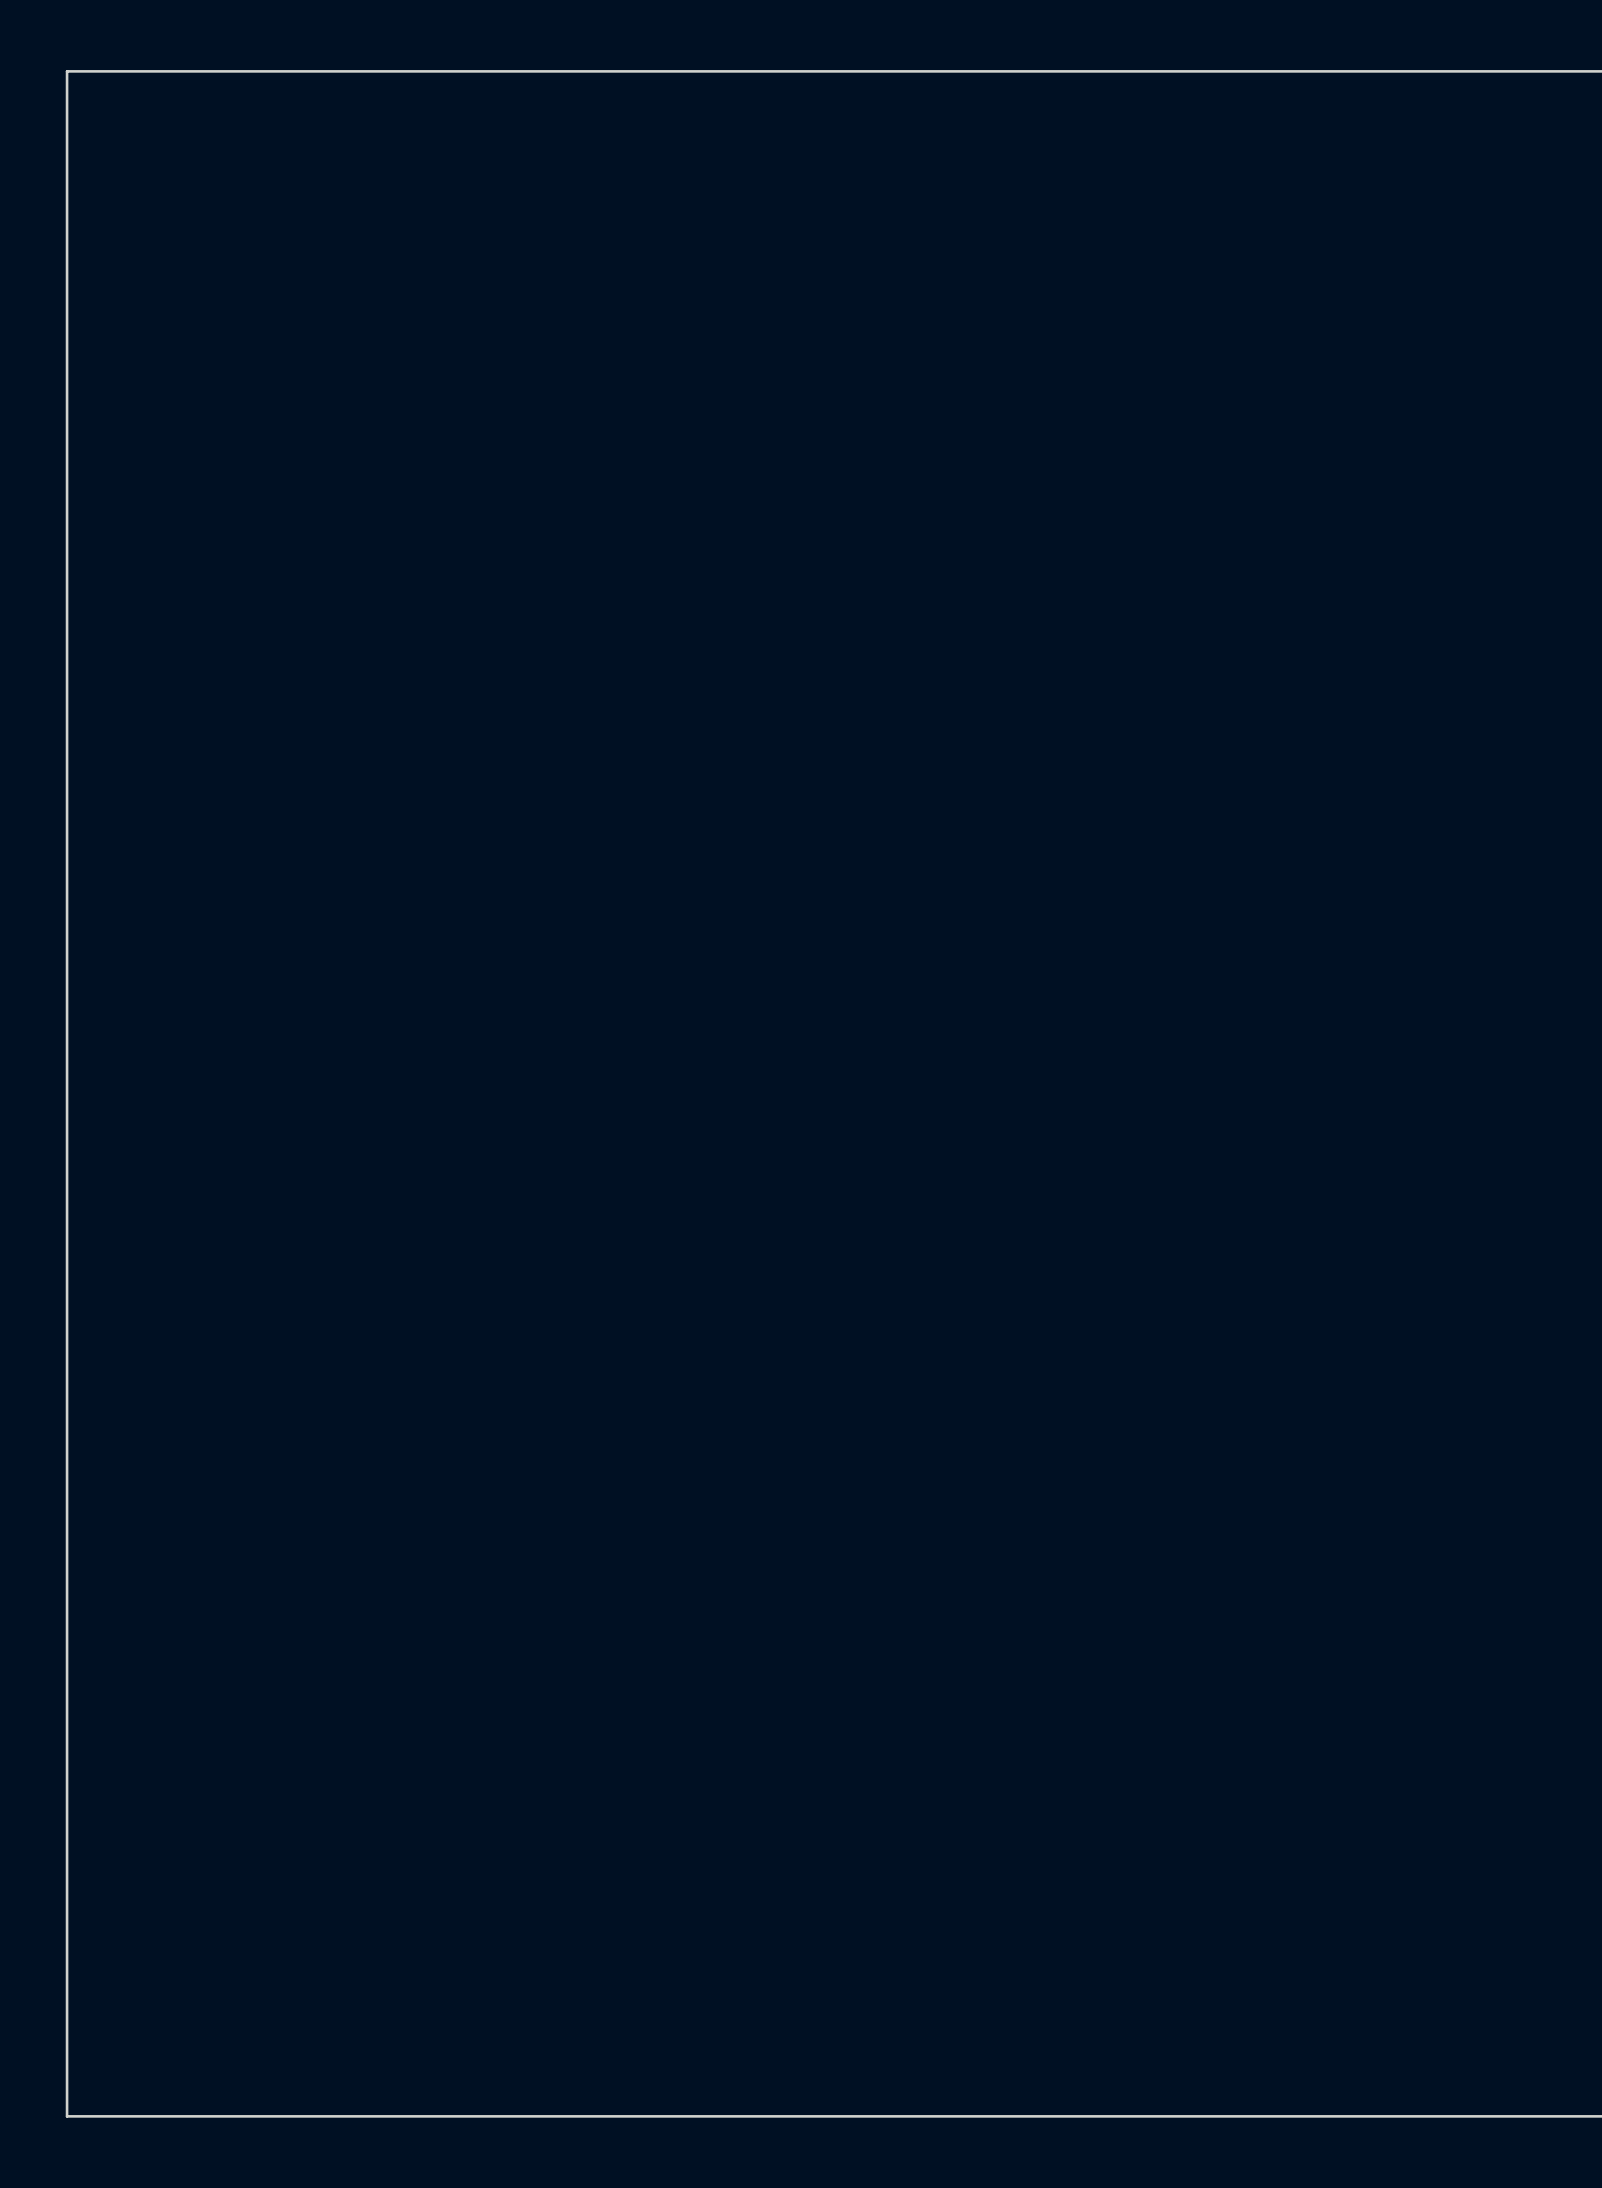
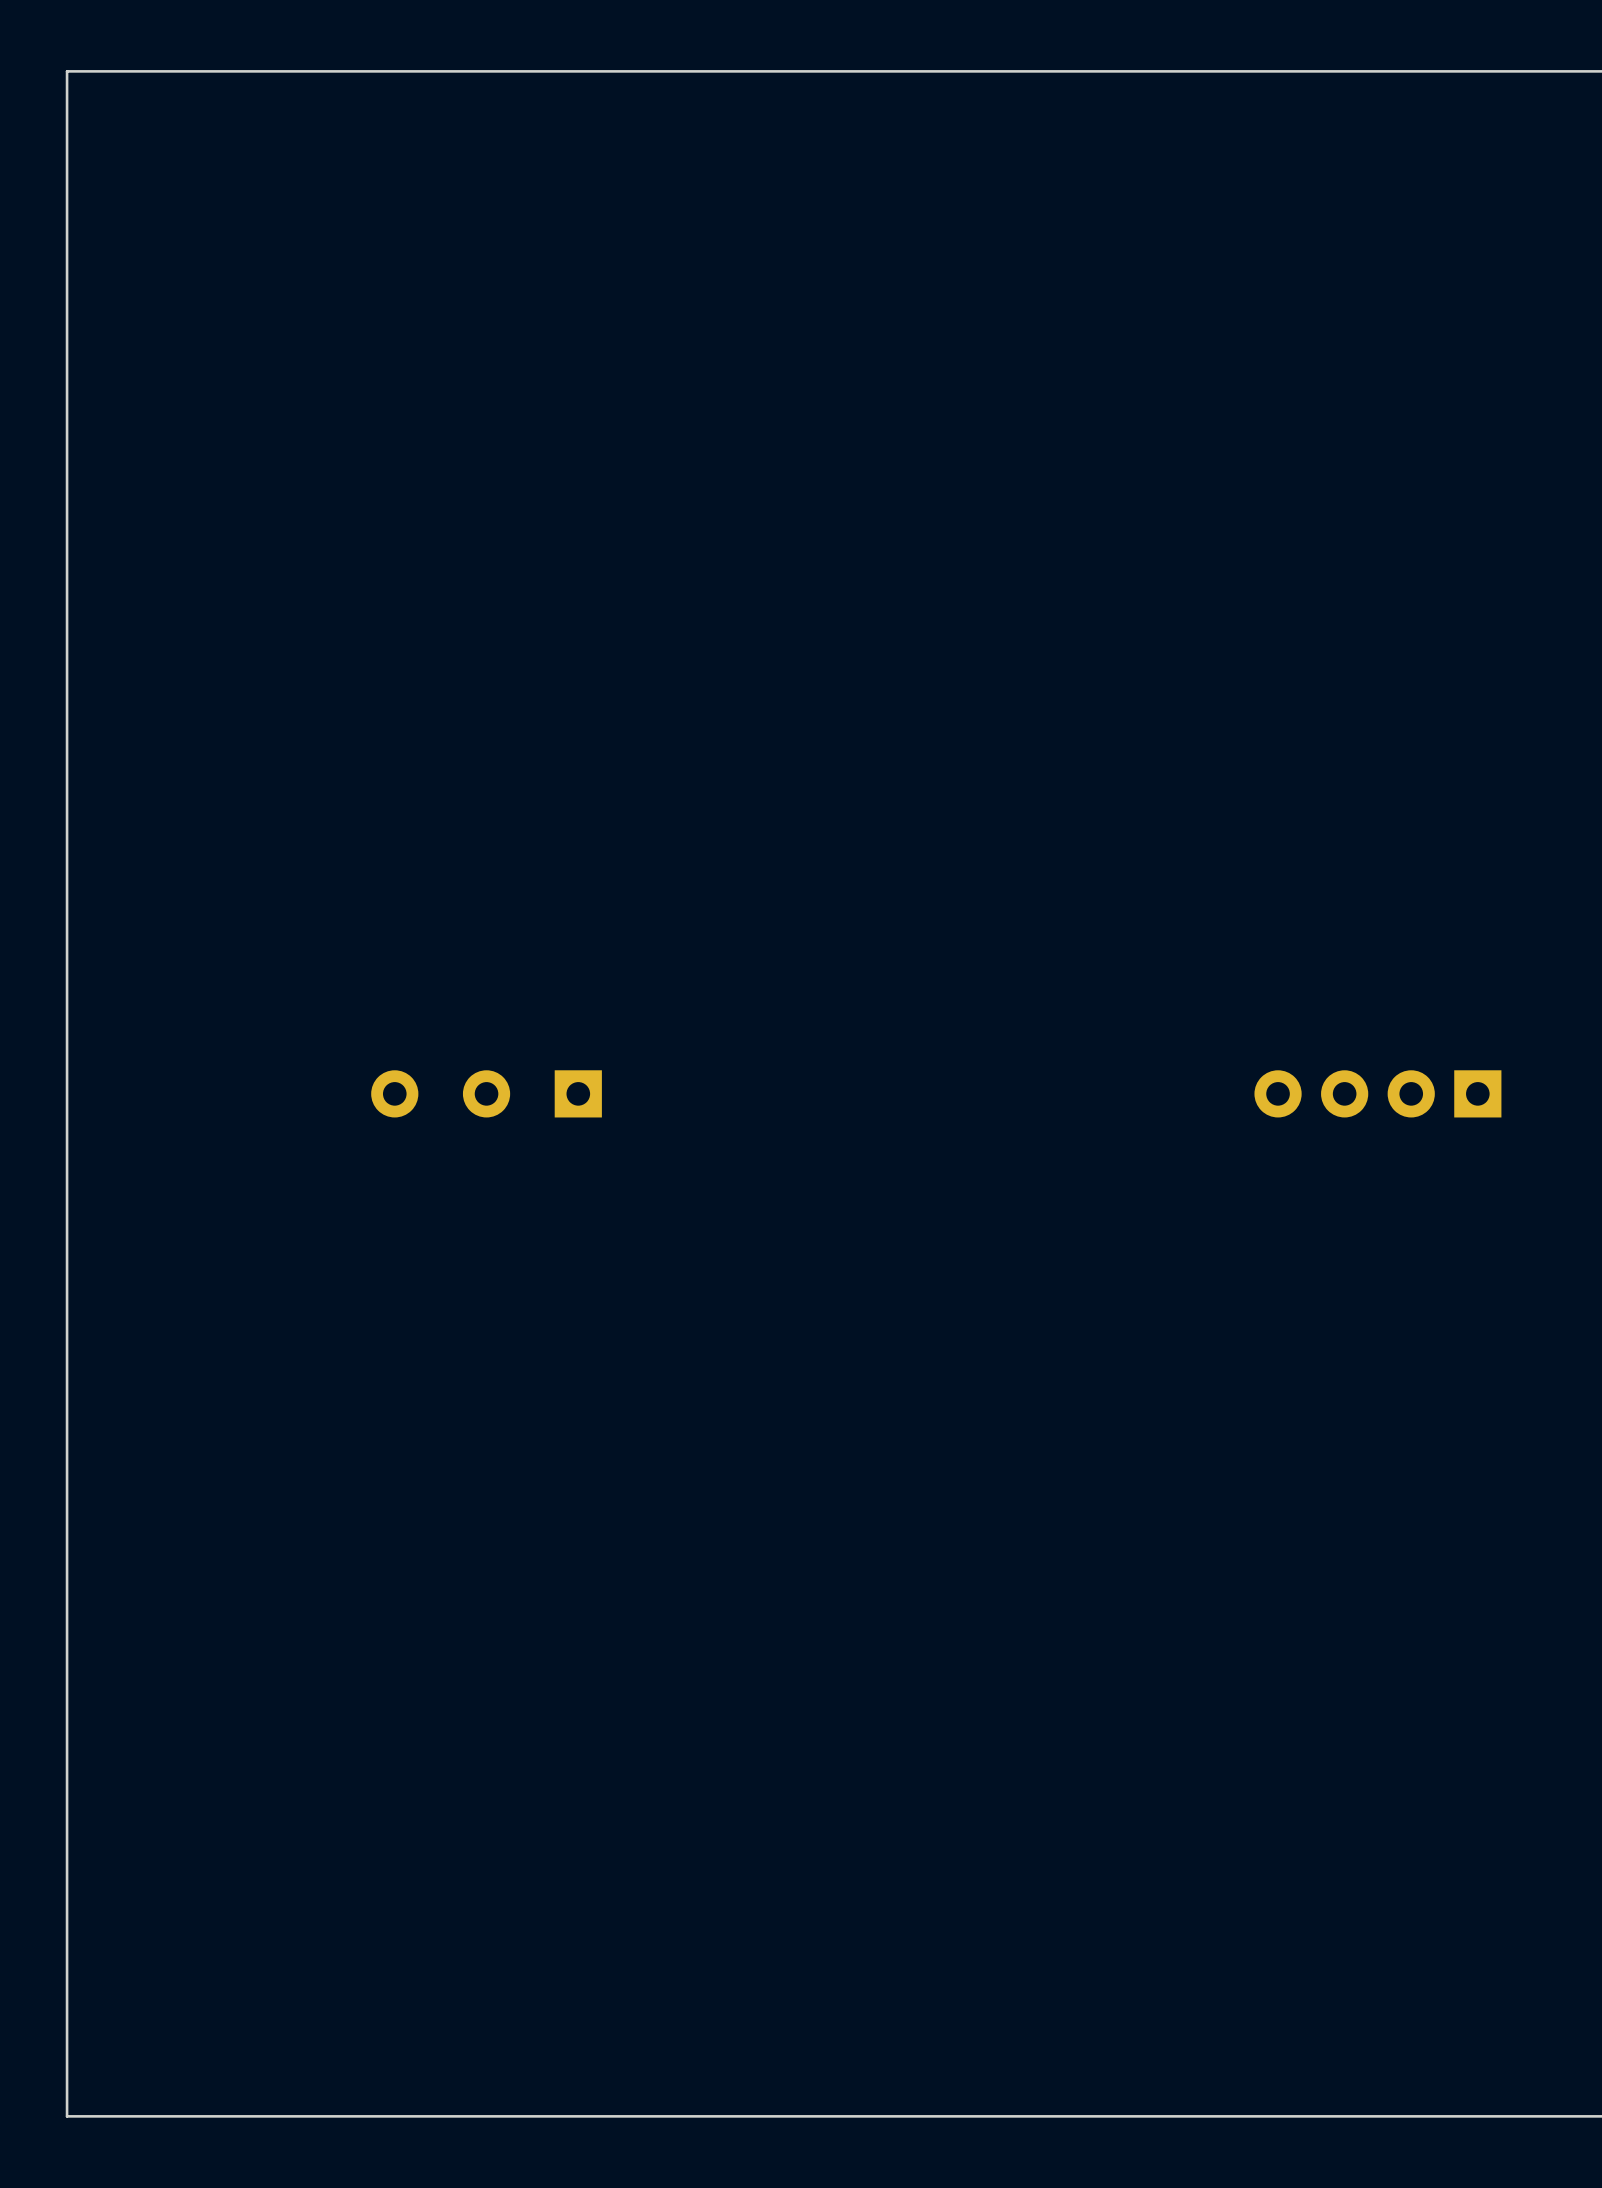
part: none -> (486, 1093)
part: none -> (1377, 1093)

